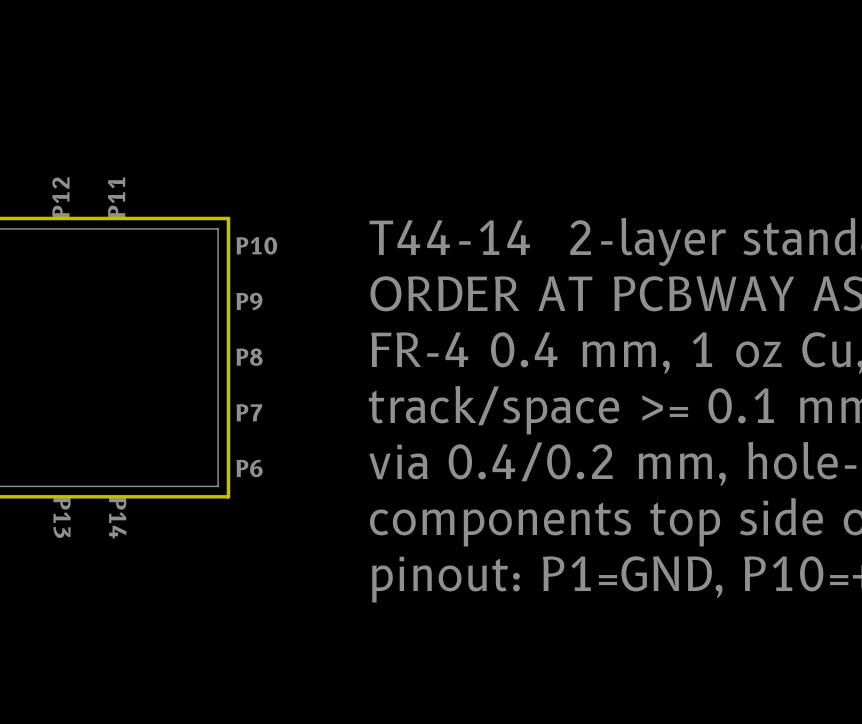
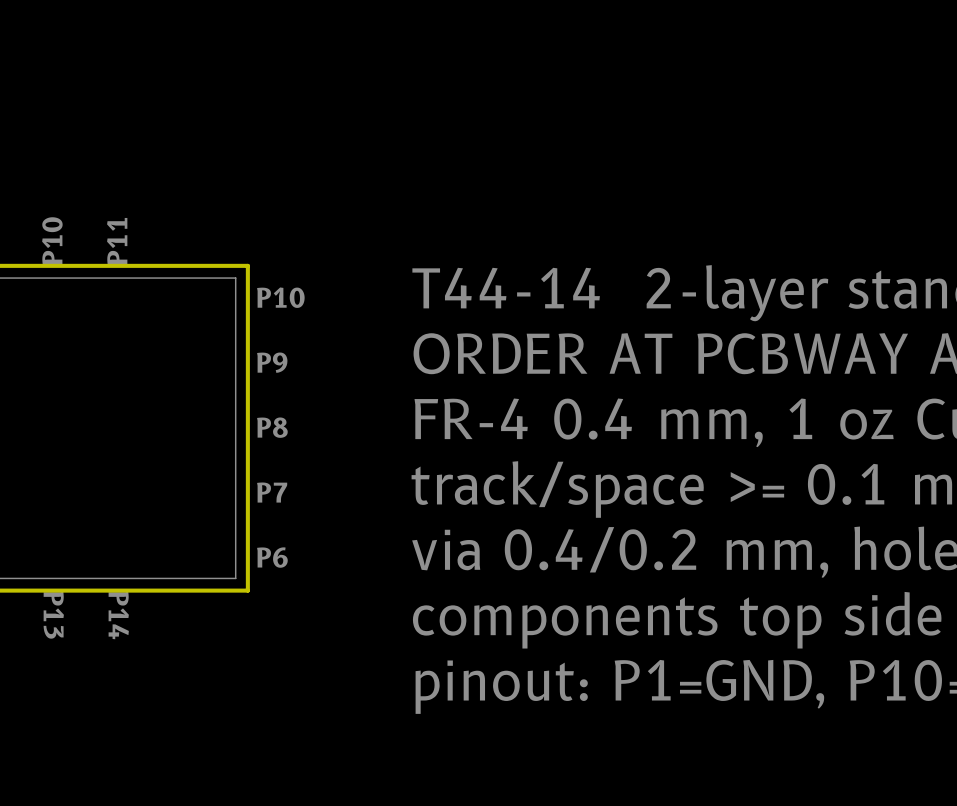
text: P12 (60, 197) -> P10 (52, 241)

